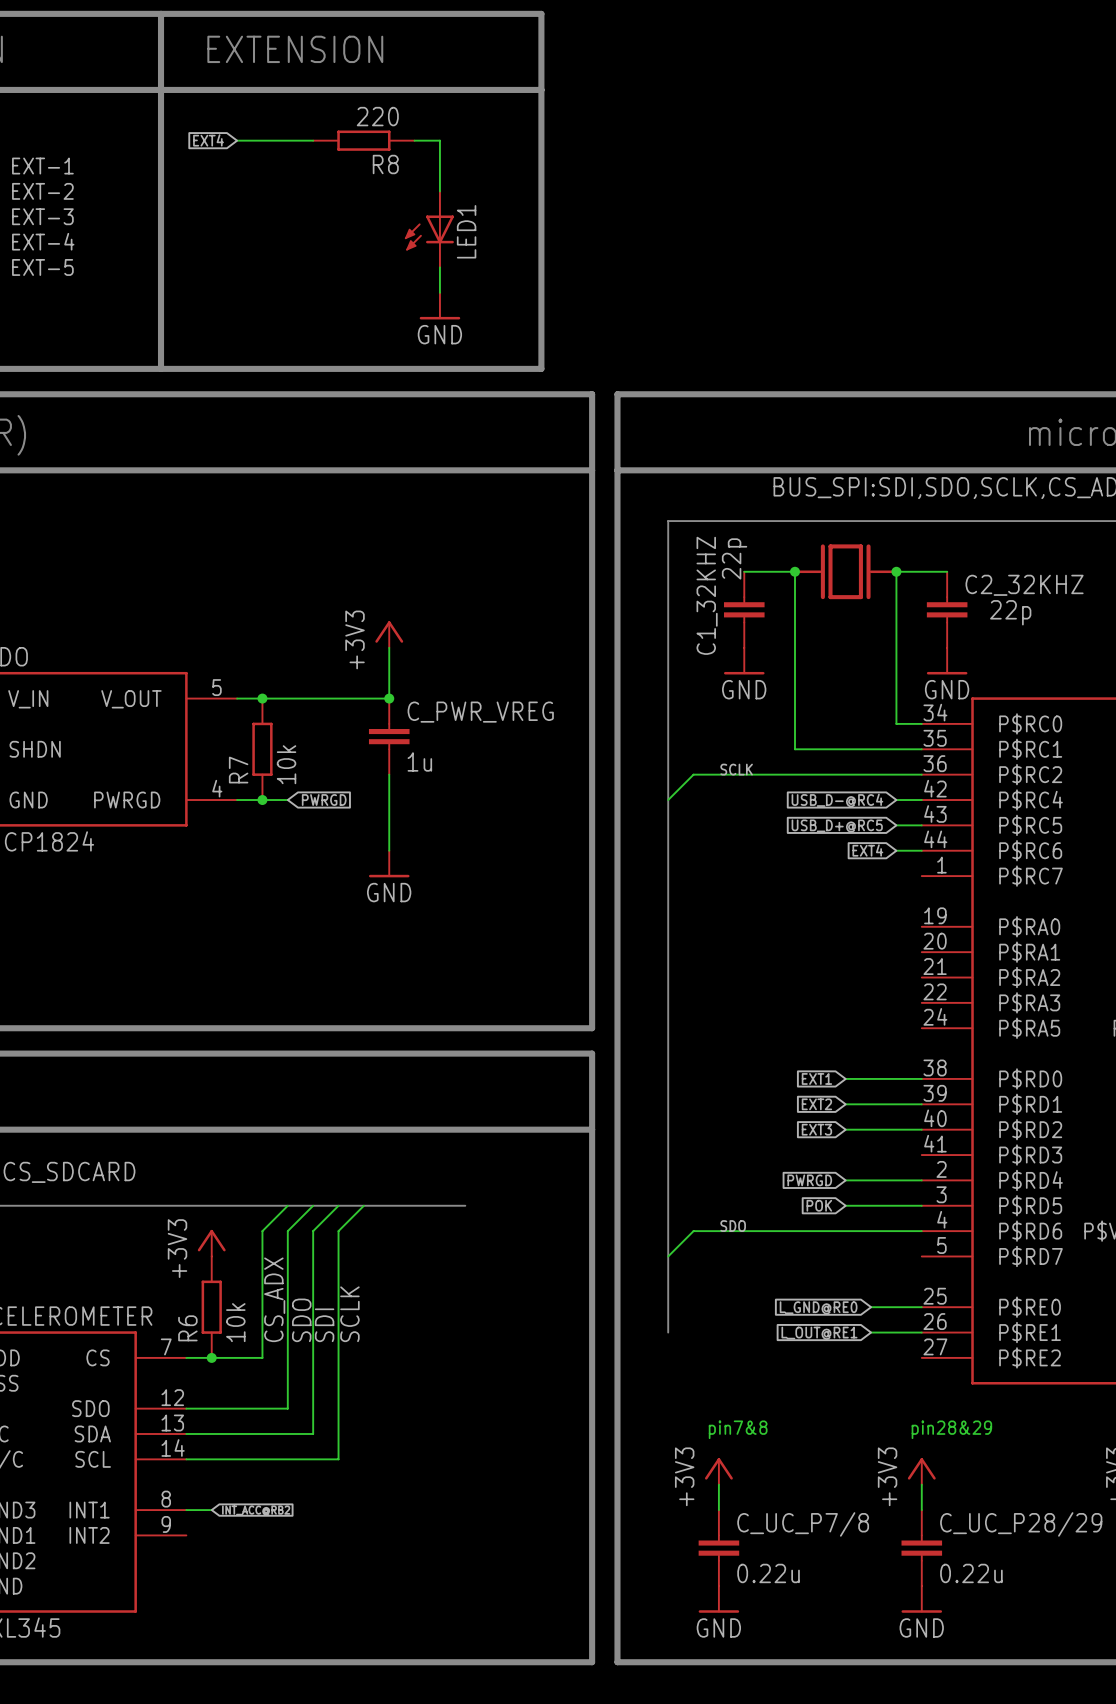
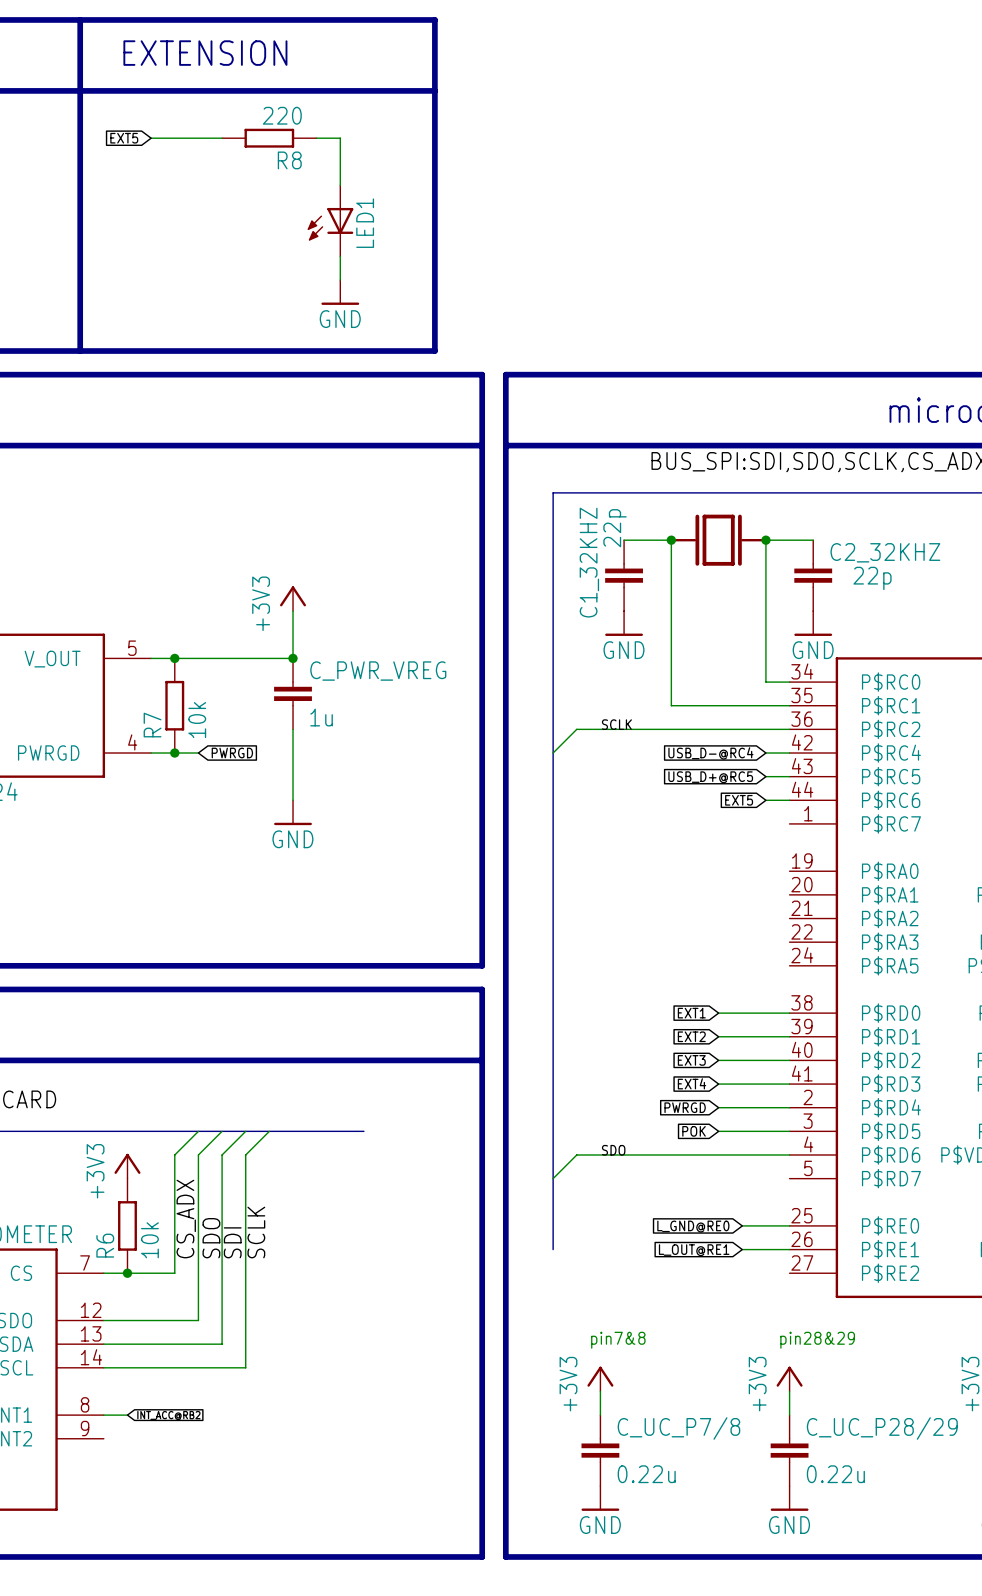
global label: EXT4 (208, 140) -> EXT5 (124, 138)
global label: EXT4 (867, 850) -> EXT5 (739, 800)
global label: none -> EXT4 (692, 1083)
wire: none -> (718, 1084) (789, 1084)

